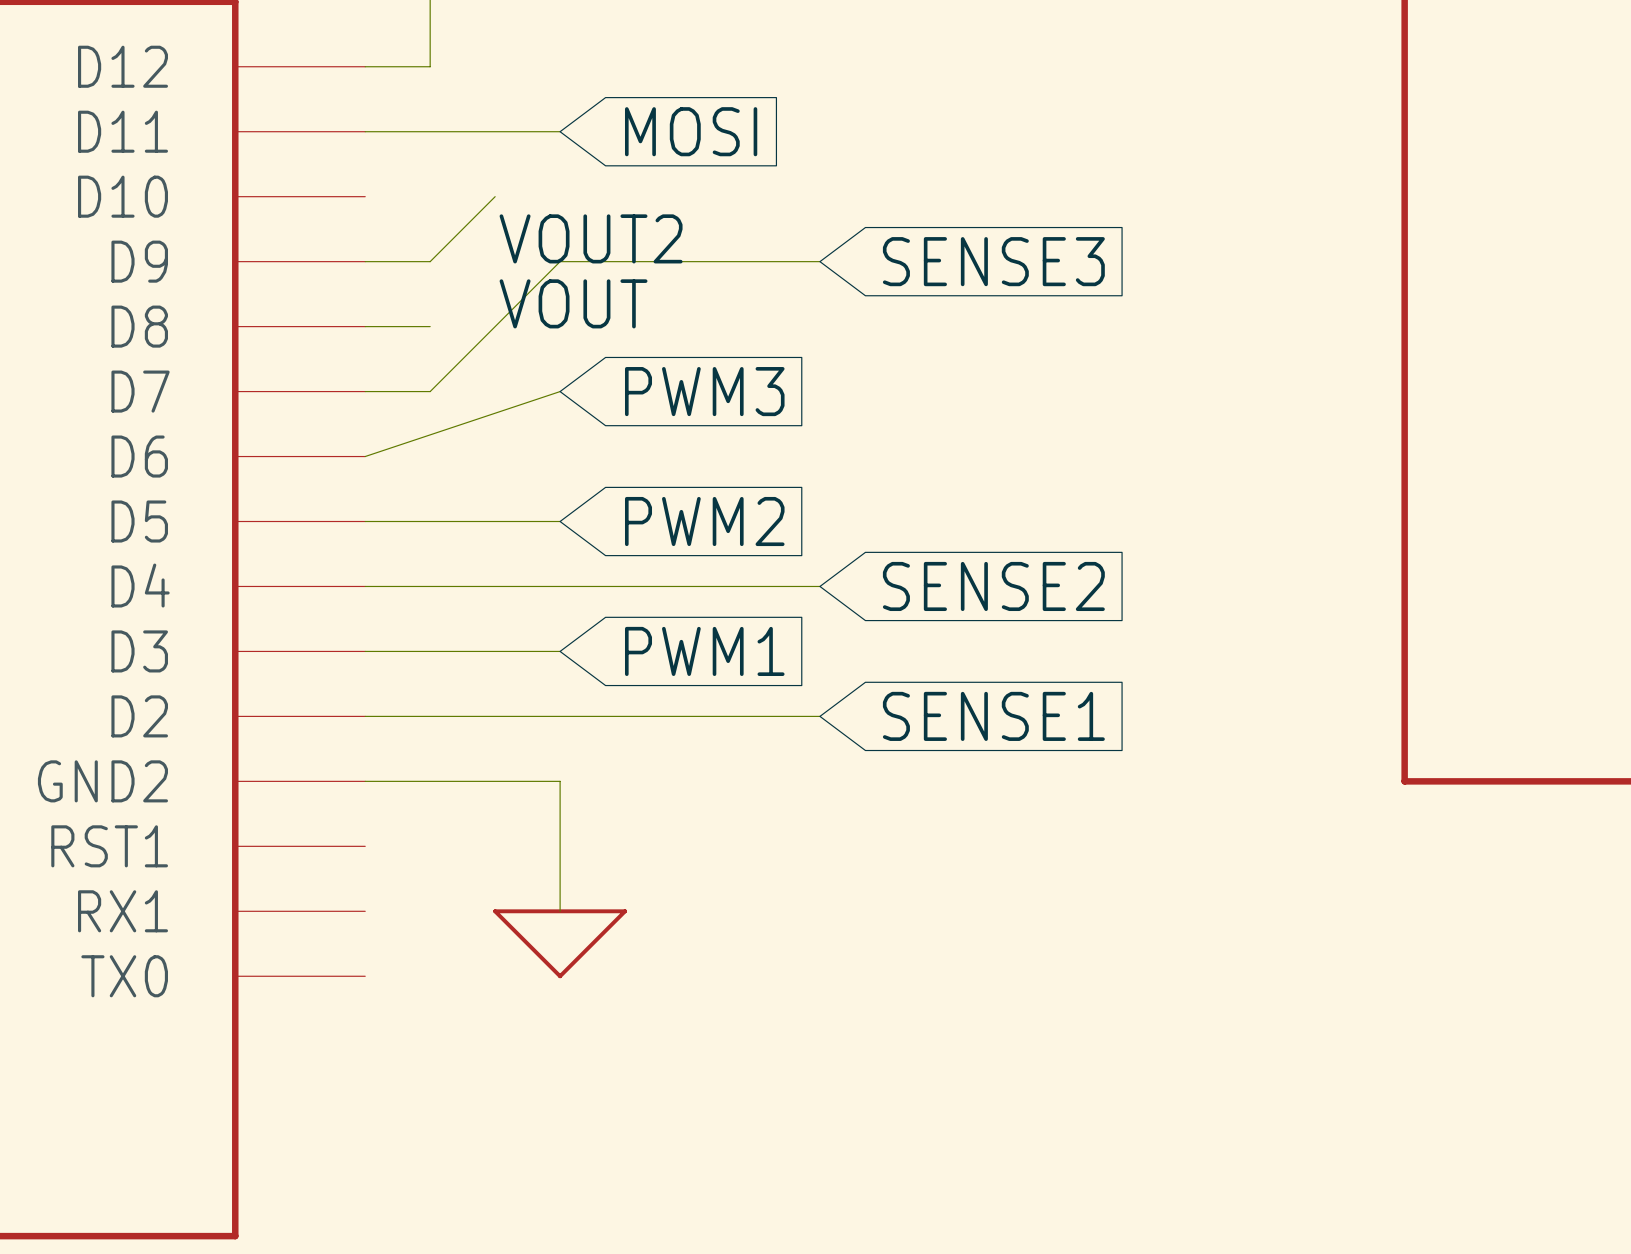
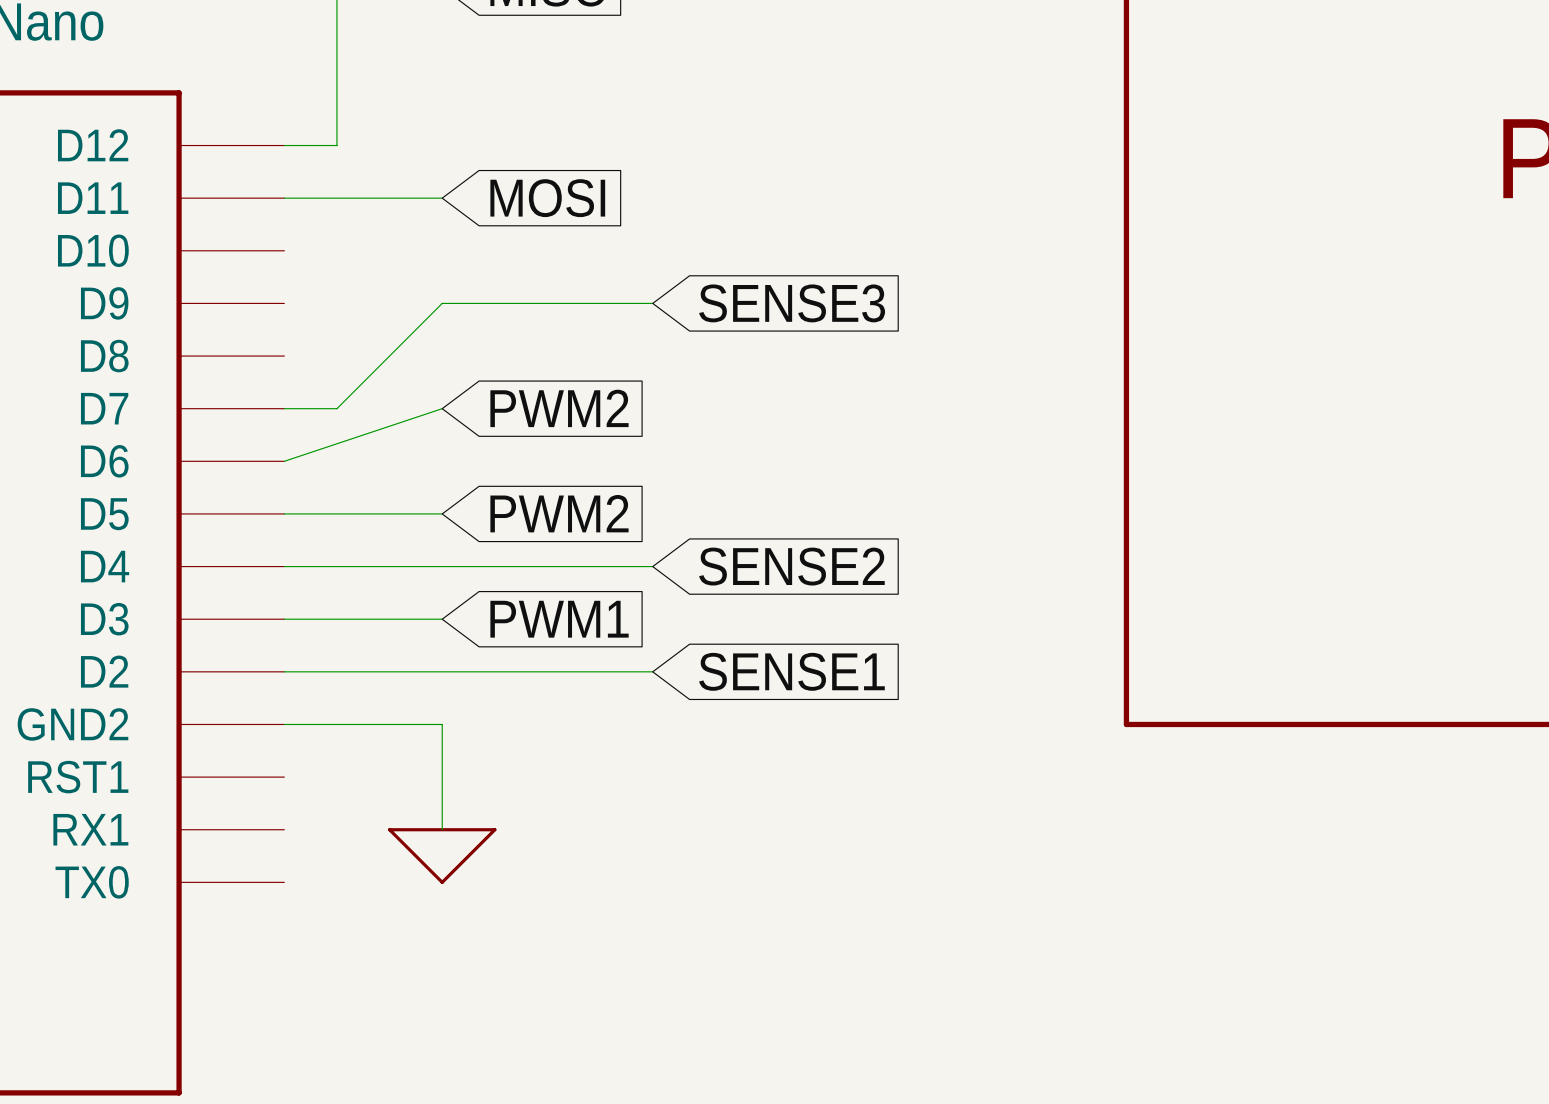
wire: (495, 196) (430, 261) (365, 261) -> none
label: VOUT2 (591, 238) -> none
label: VOUT (573, 303) -> none
wire: (365, 326) (430, 326) -> none
global label: PWM3 (704, 391) -> PWM2 (559, 408)

